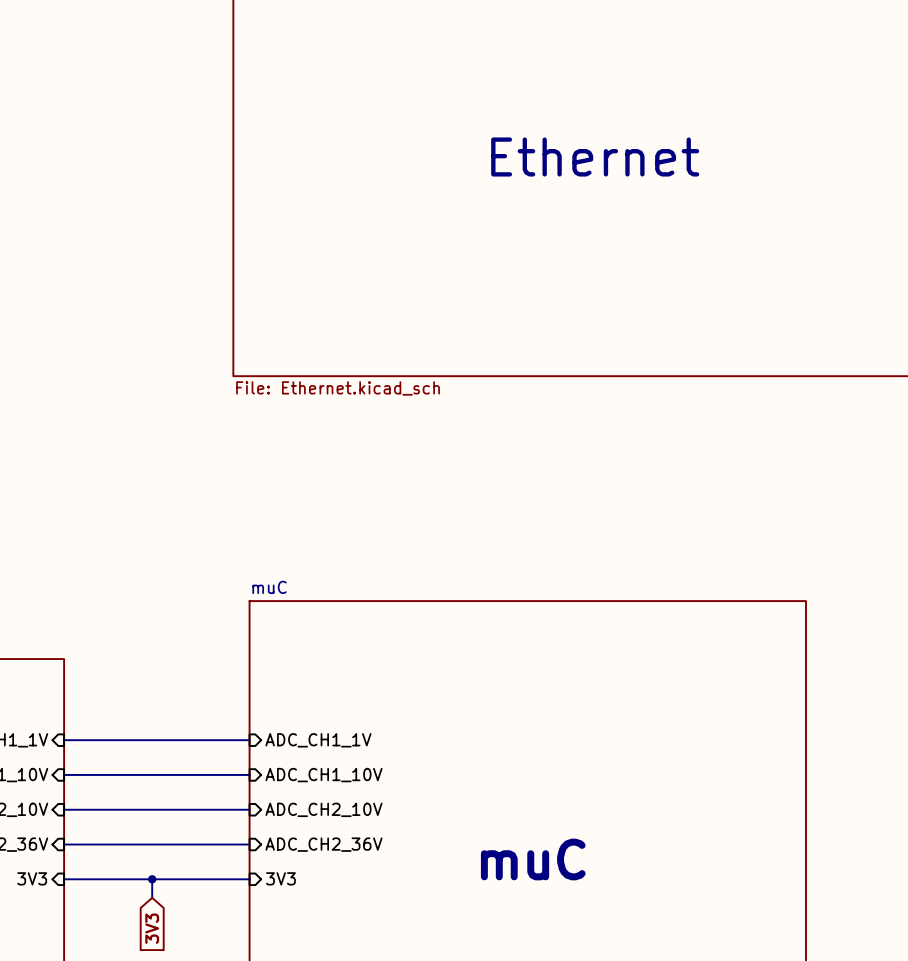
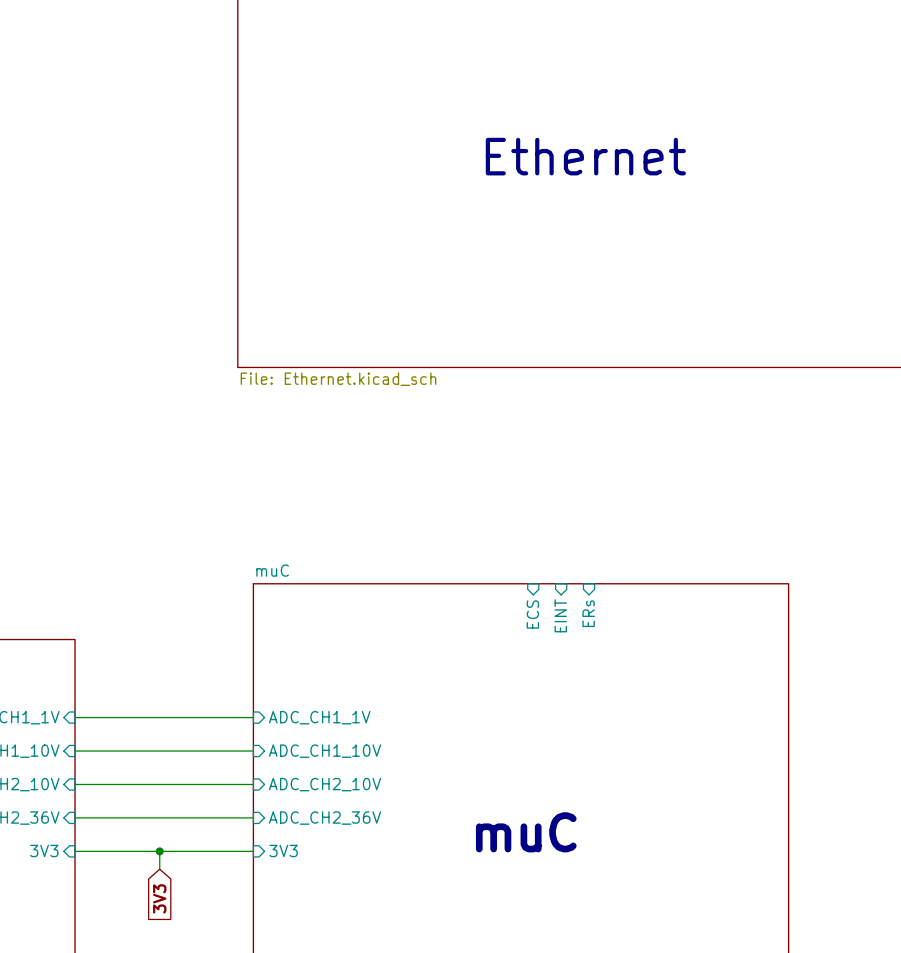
sheet pin: none -> ERs (588, 613)
sheet pin: none -> ECS (532, 614)
sheet pin: none -> EINT (560, 615)

